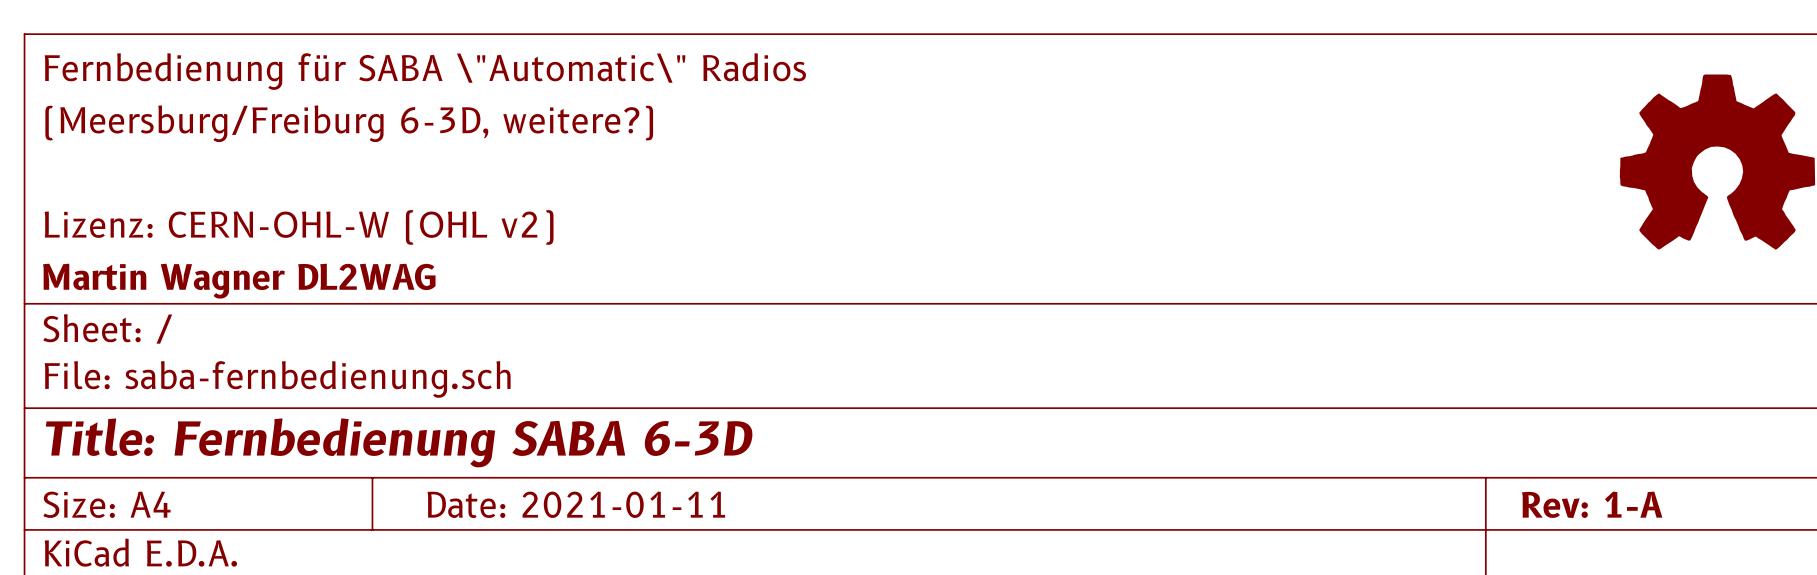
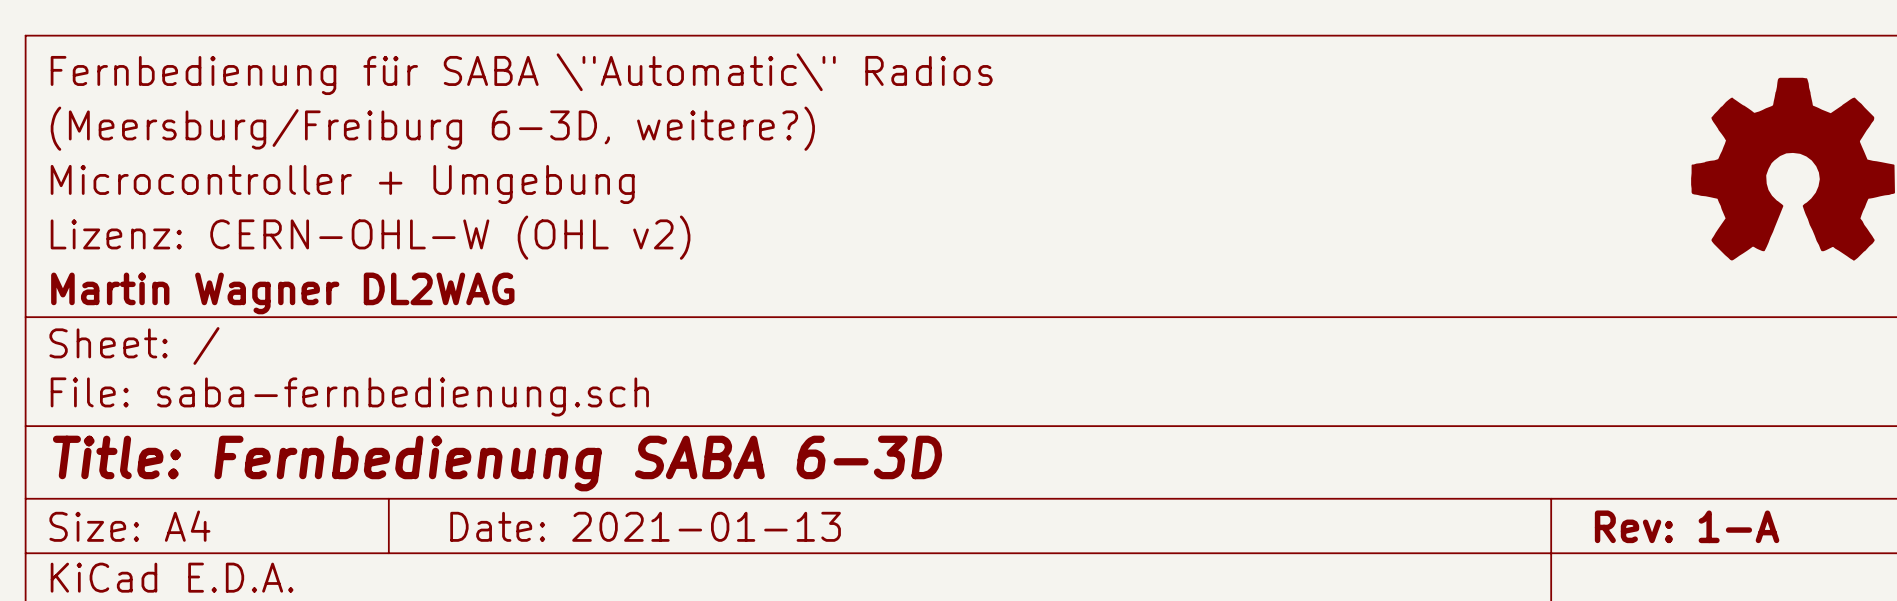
title block: none -> Microcontroller + Umgebung (342, 184)
title block: Date: 2021-01-11 (576, 504) -> Date: 2021-01-13 (645, 526)

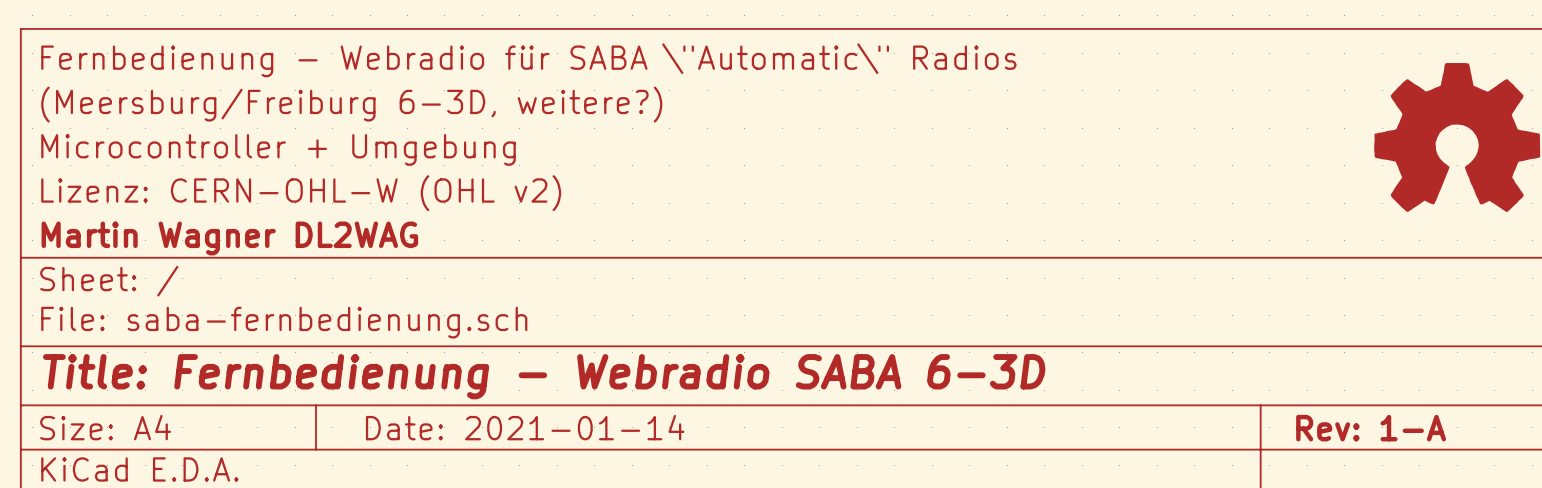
title block: Fernbedienung für SABA \"Automatic\" Radios (521, 74) -> Fernbedienung - Webradio für SABA \"Automatic\" Radios (528, 60)
title block: Title: Fernbedienung SABA 6-3D (497, 463) -> Title: Fernbedienung - Webradio SABA 6-3D (544, 376)
title block: Date: 2021-01-13 (645, 526) -> Date: 2021-01-14 (525, 427)

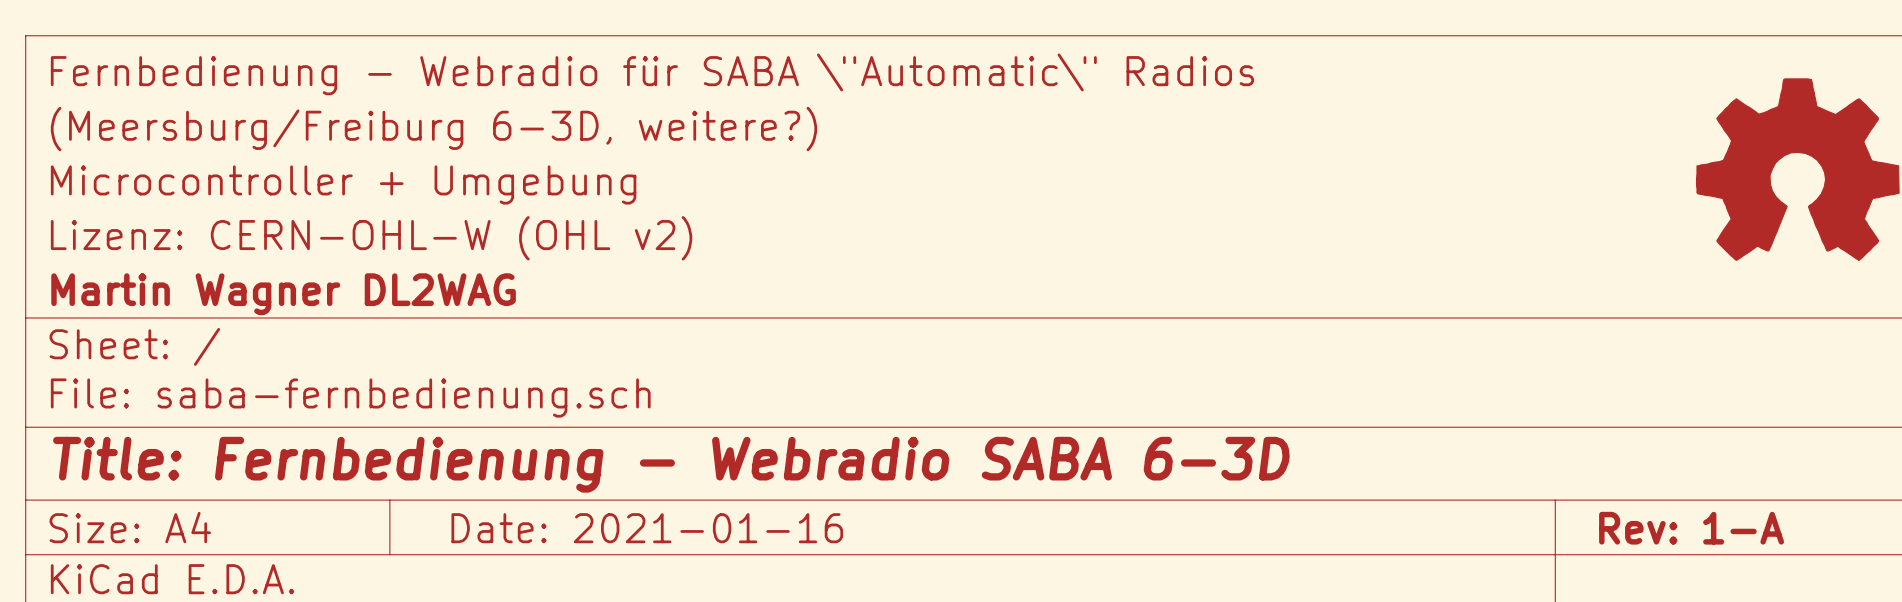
title block: Date: 2021-01-14 (525, 427) -> Date: 2021-01-16 (647, 528)

